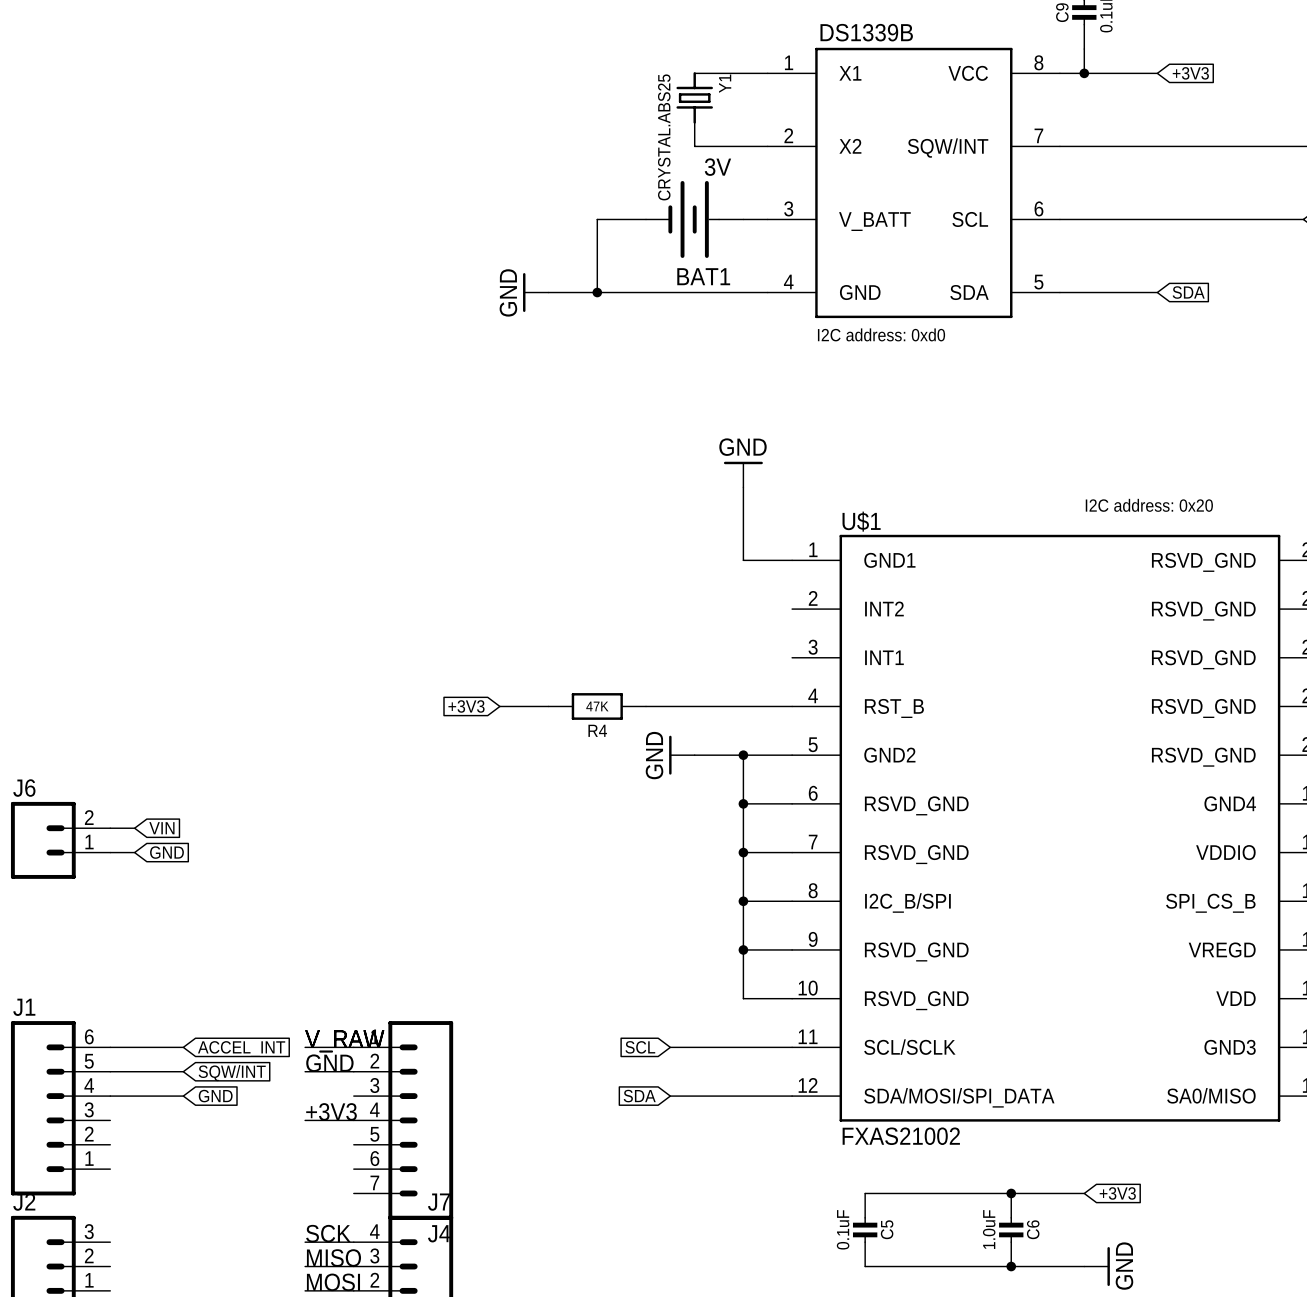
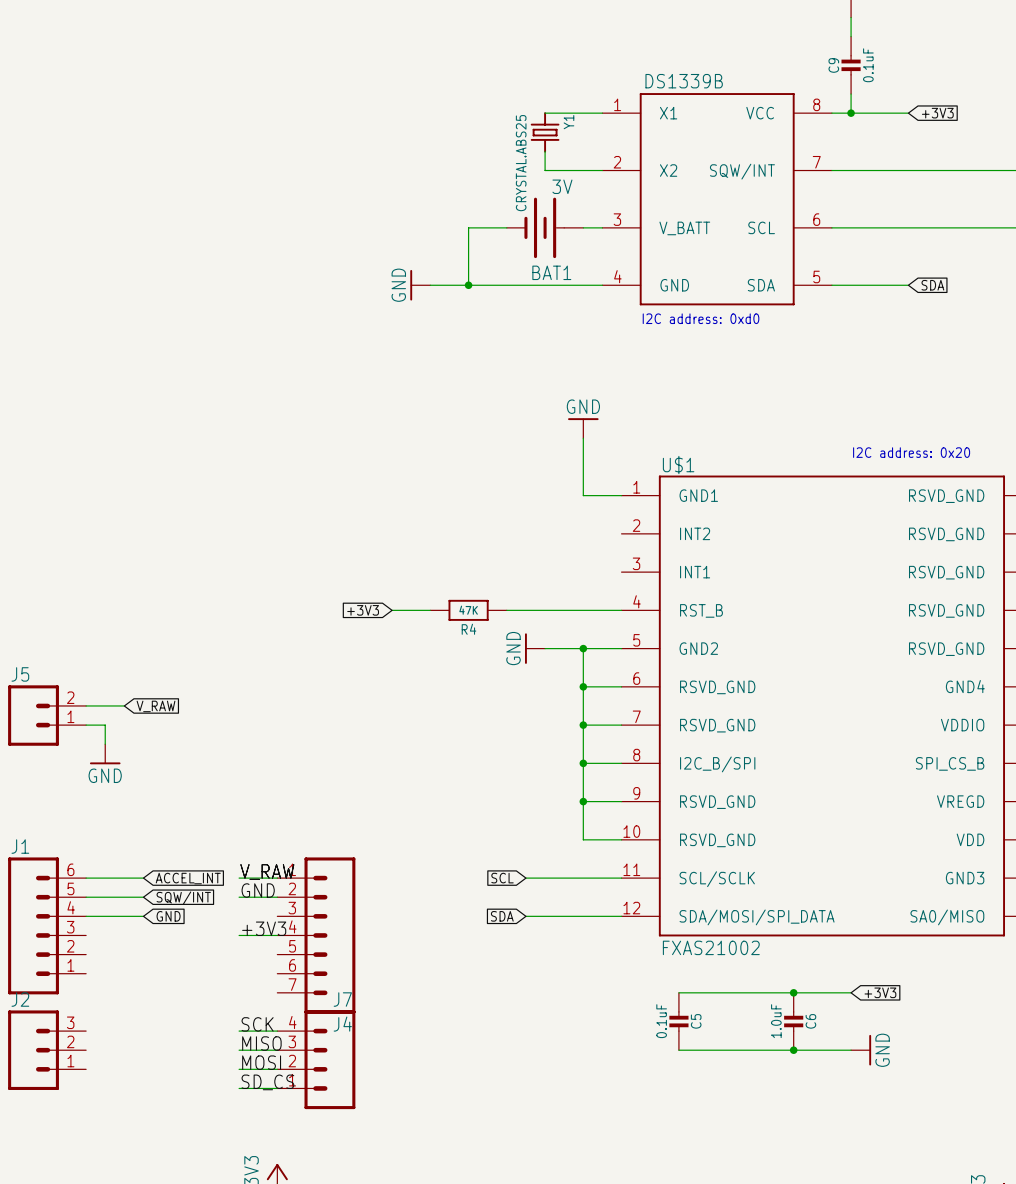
J6 name: J6 (24, 788) -> J5 (20, 674)
wire: none -> (105, 705) (124, 705)
global label: VIN (161, 828) -> none
global label: none -> V_RAW (156, 706)
wire: none -> (105, 725) (105, 744)
global label: GND (166, 852) -> none
power symbol: none -> GND (105, 754)

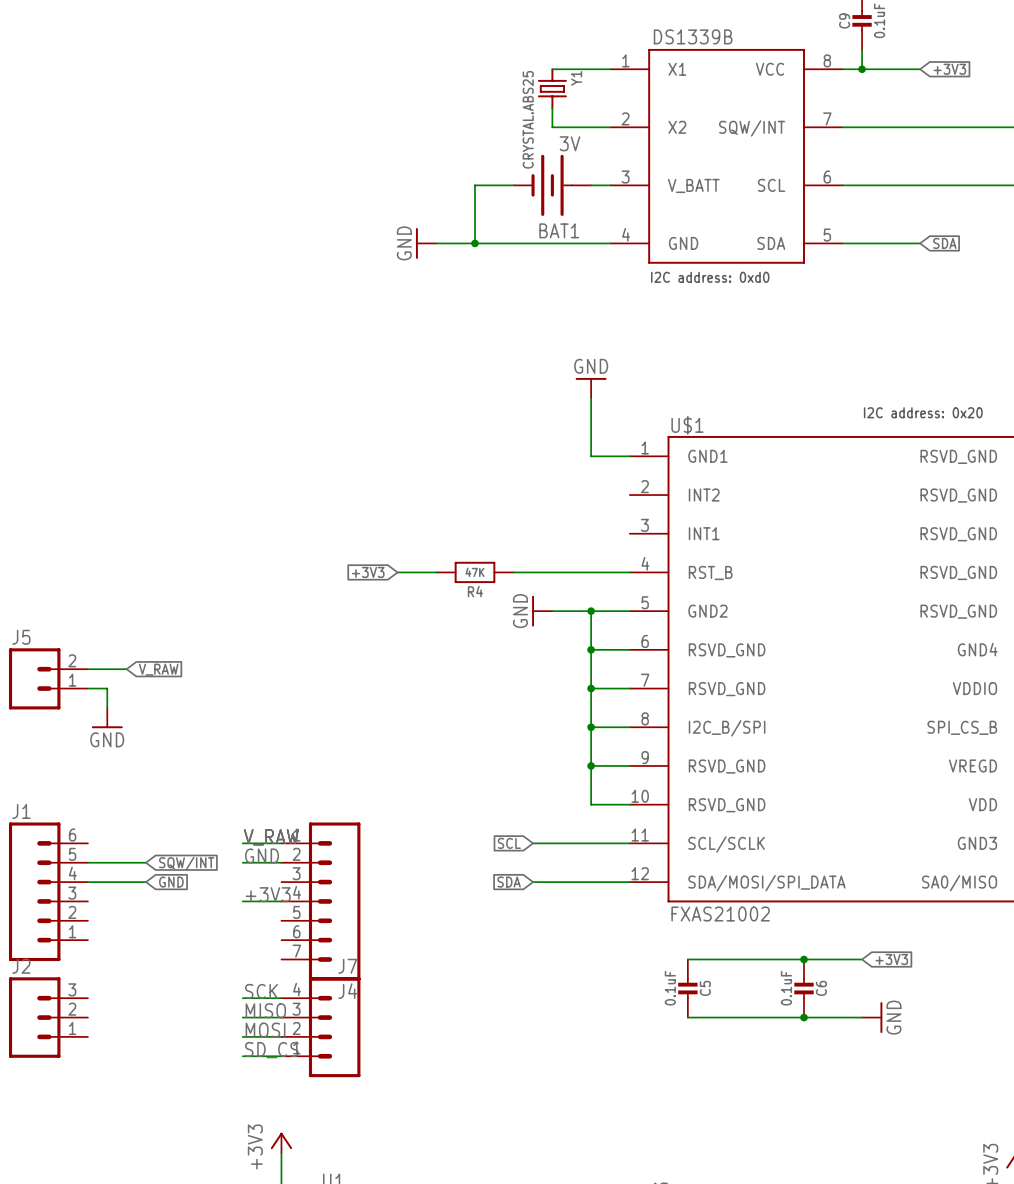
wire: (86, 878) (143, 878) -> none
global label: ACCEL_INT (188, 878) -> none
C6 value: 1.0uF (776, 1021) -> 0.1uF (786, 988)

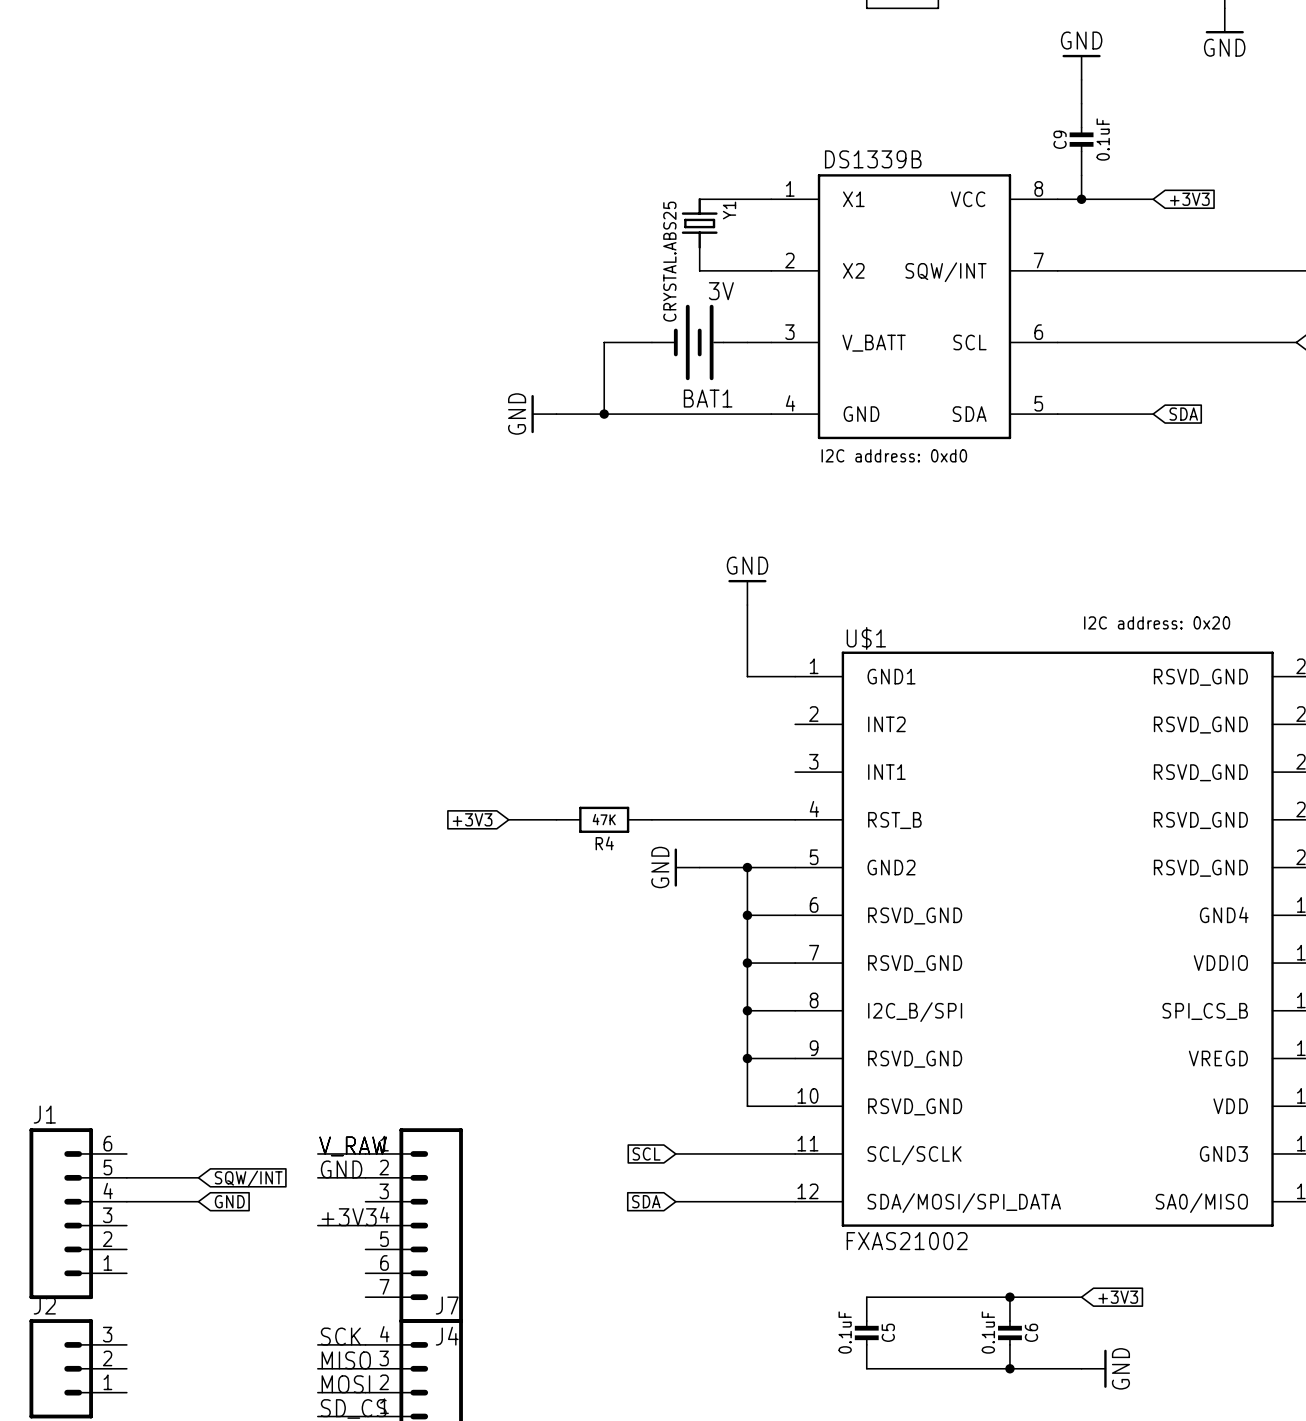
wire: (87, 669) (126, 669) -> none
global label: V_RAW (158, 669) -> none
J5: (48, 678) -> none
wire: (87, 688) (107, 688) (107, 707) -> none
power symbol: GND (107, 718) -> none

